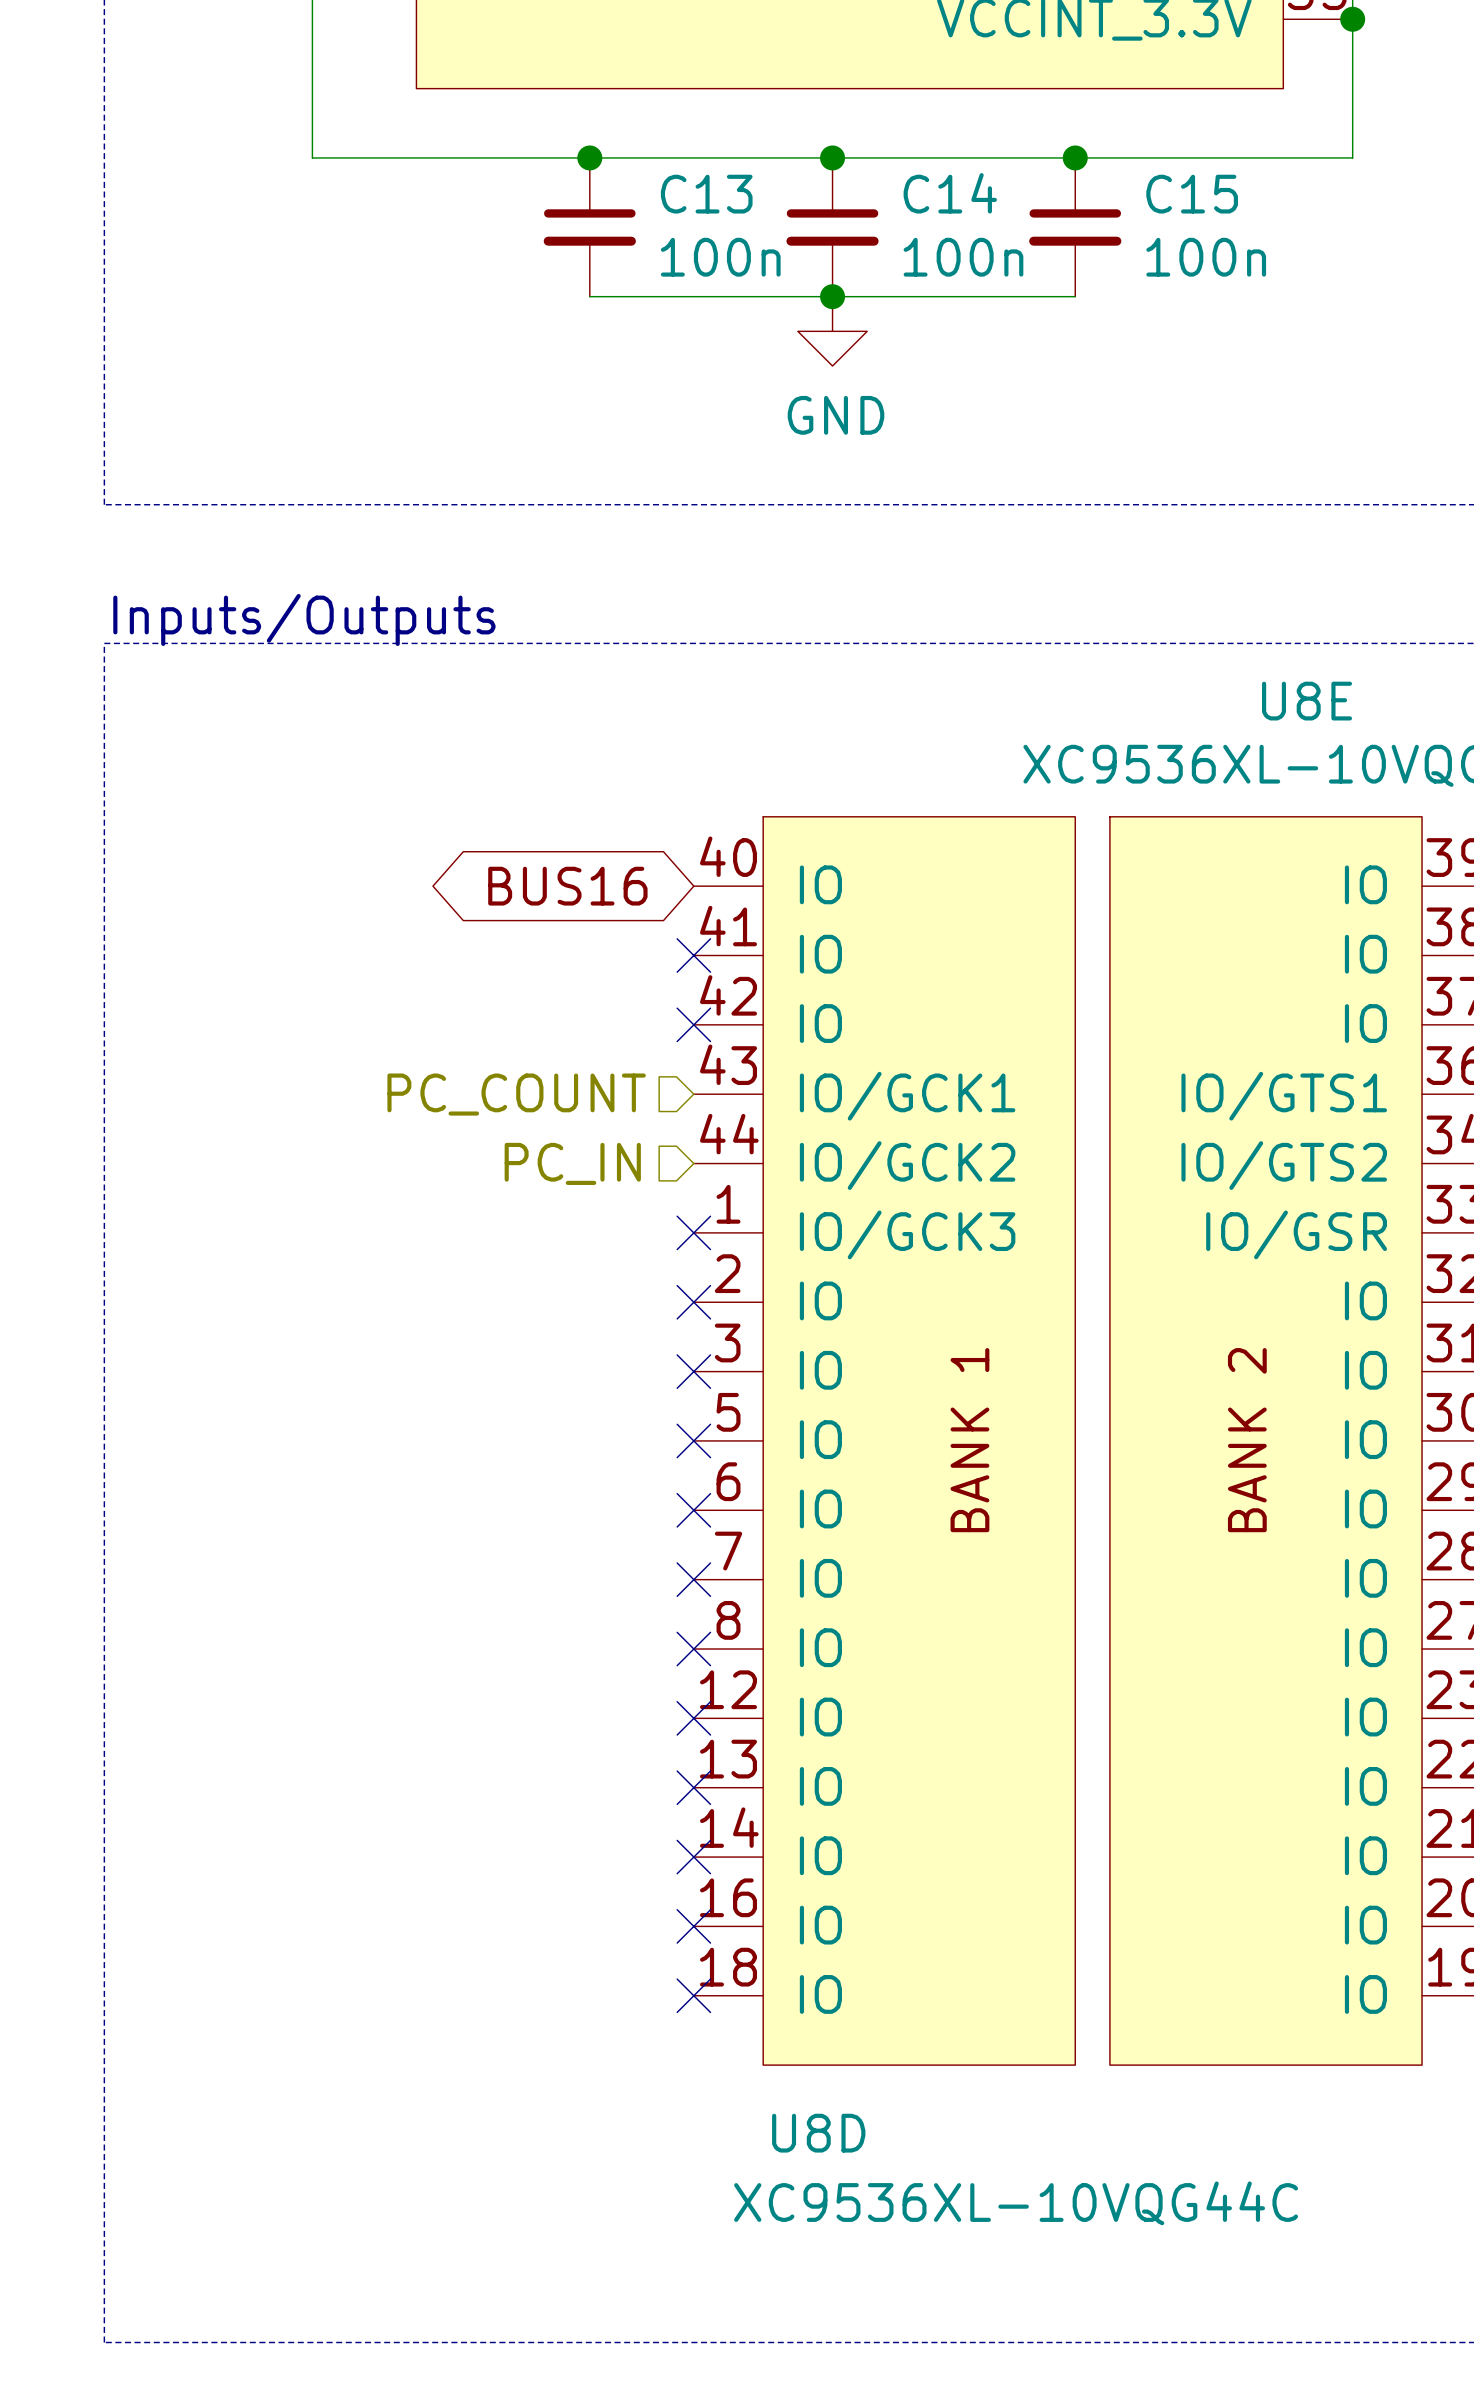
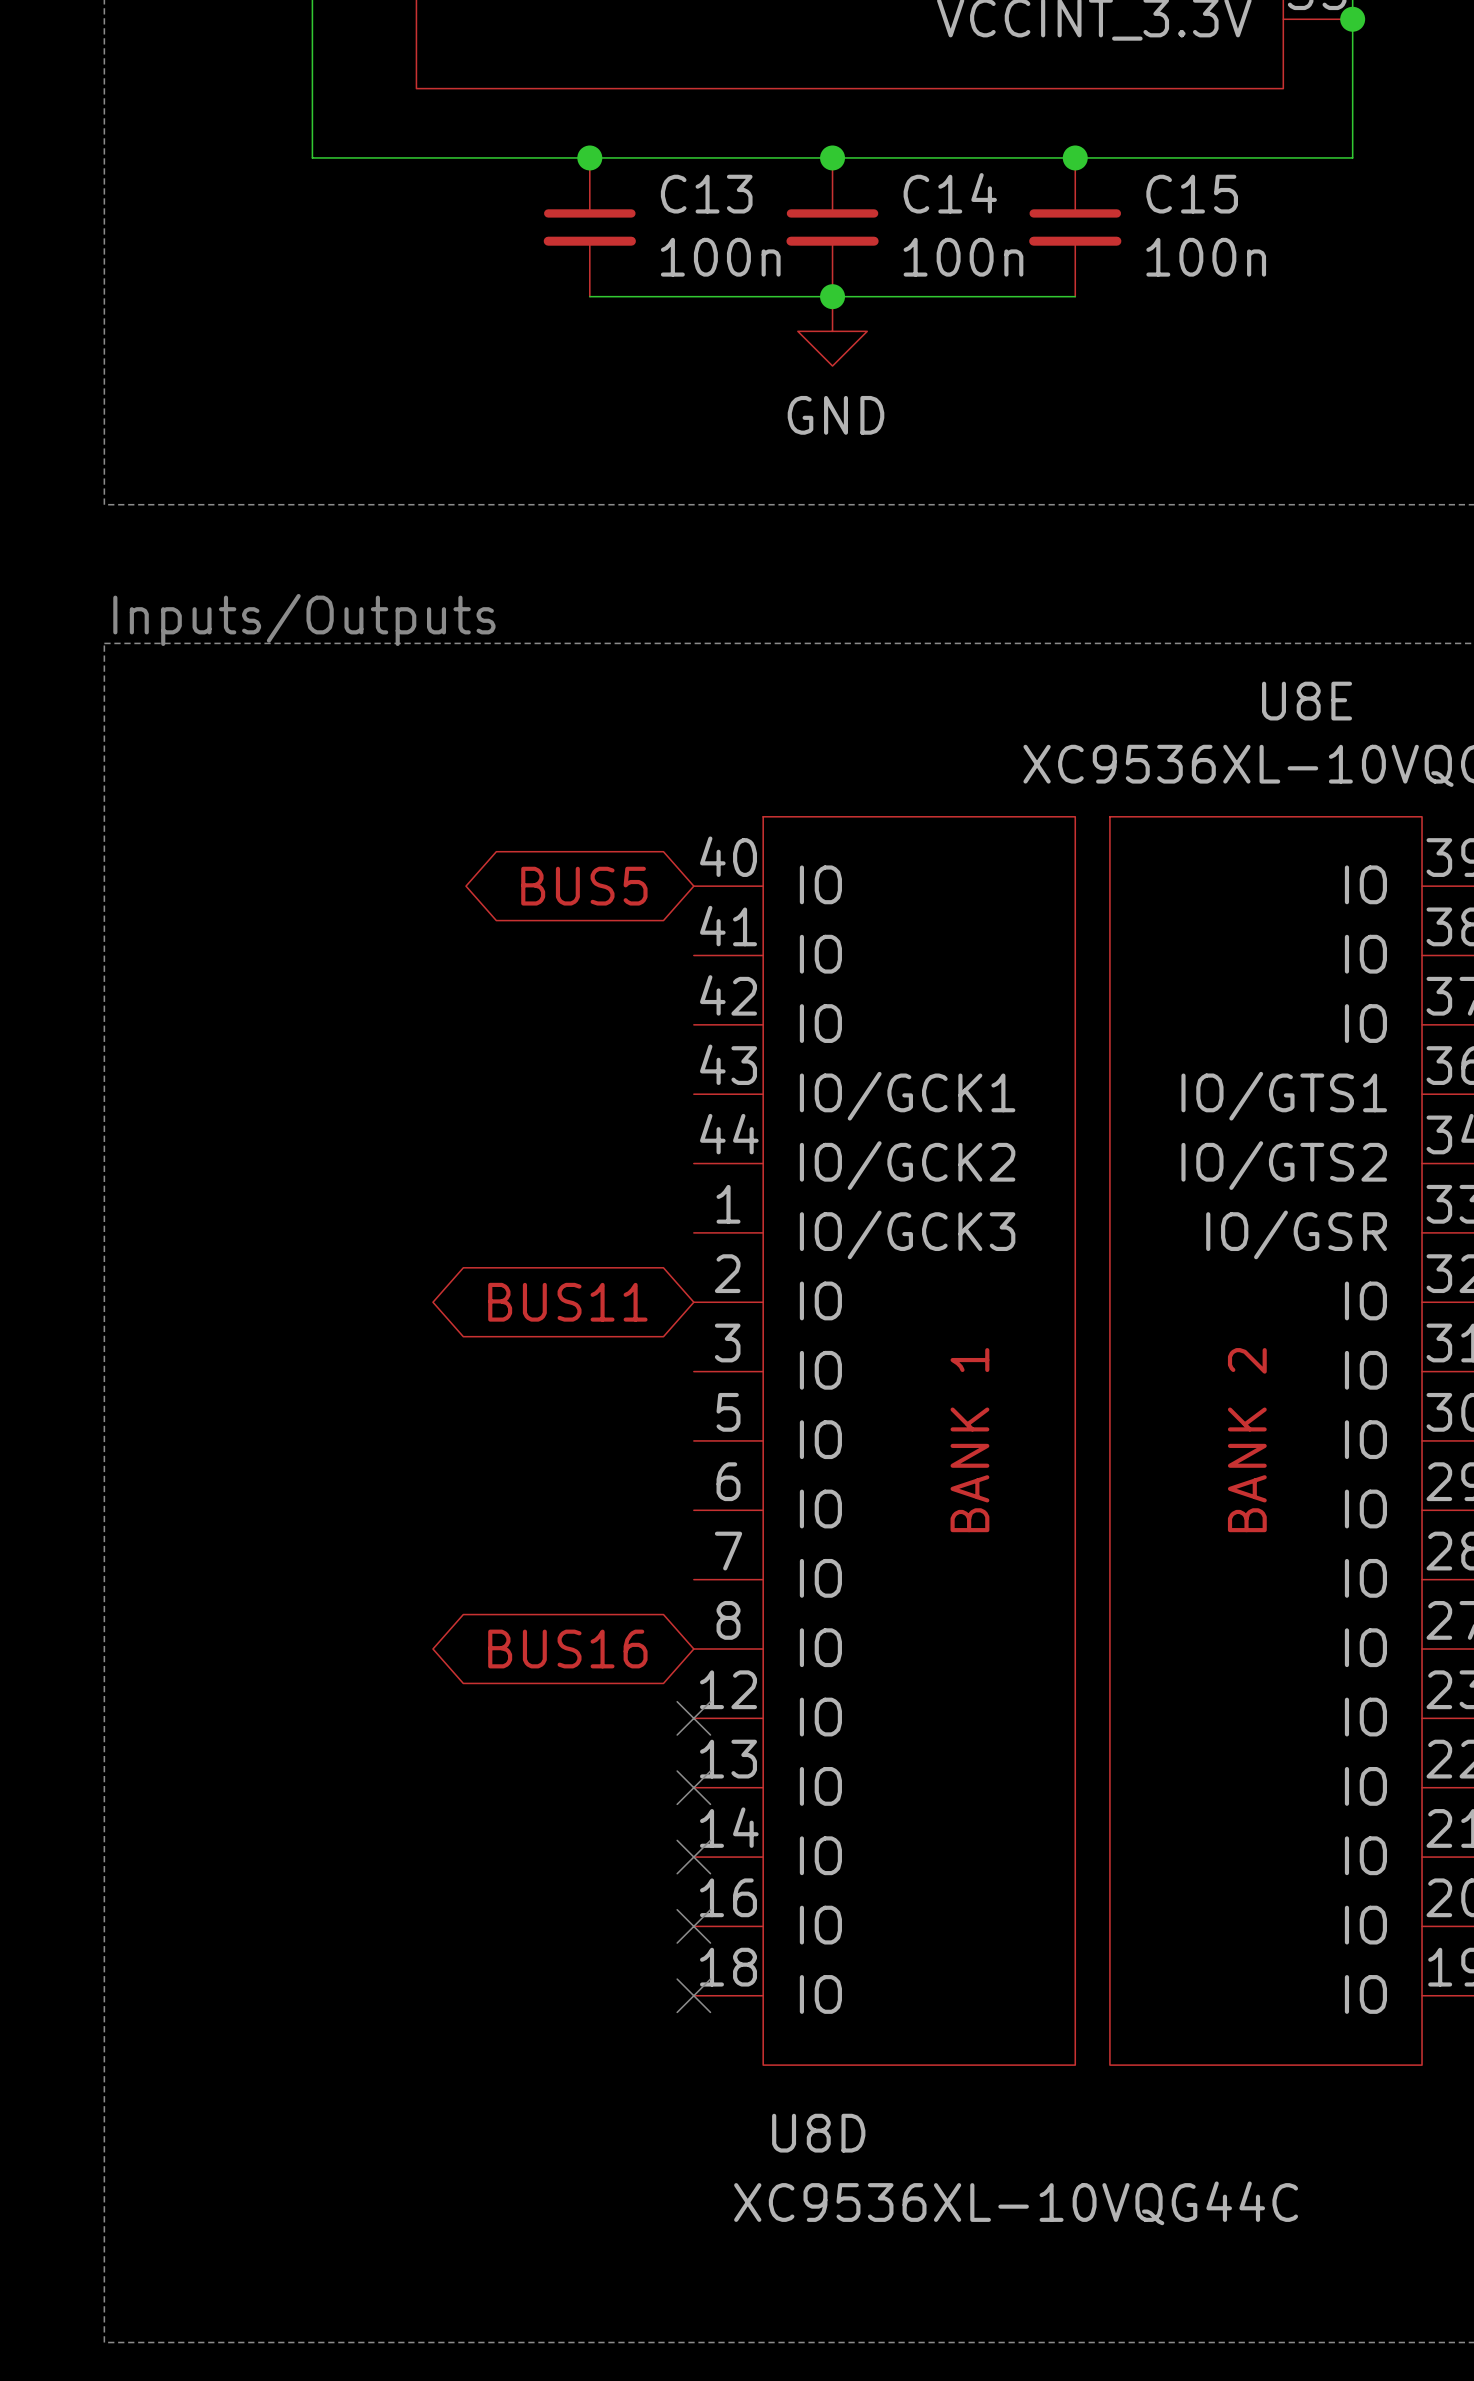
global label: BUS16 (567, 886) -> BUS5 (584, 886)
no-connect mark: (693, 955) -> none
no-connect mark: (693, 1024) -> none
hierarchical label: PC_COUNT (516, 1094) -> none
hierarchical label: PC_IN (572, 1163) -> none
no-connect mark: (693, 1232) -> none
global label: none -> BUS11 (567, 1302)
no-connect mark: (693, 1302) -> none
no-connect mark: (693, 1371) -> none
no-connect mark: (693, 1440) -> none
no-connect mark: (693, 1510) -> none
no-connect mark: (693, 1579) -> none
global label: none -> BUS16 (567, 1649)
no-connect mark: (693, 1649) -> none

